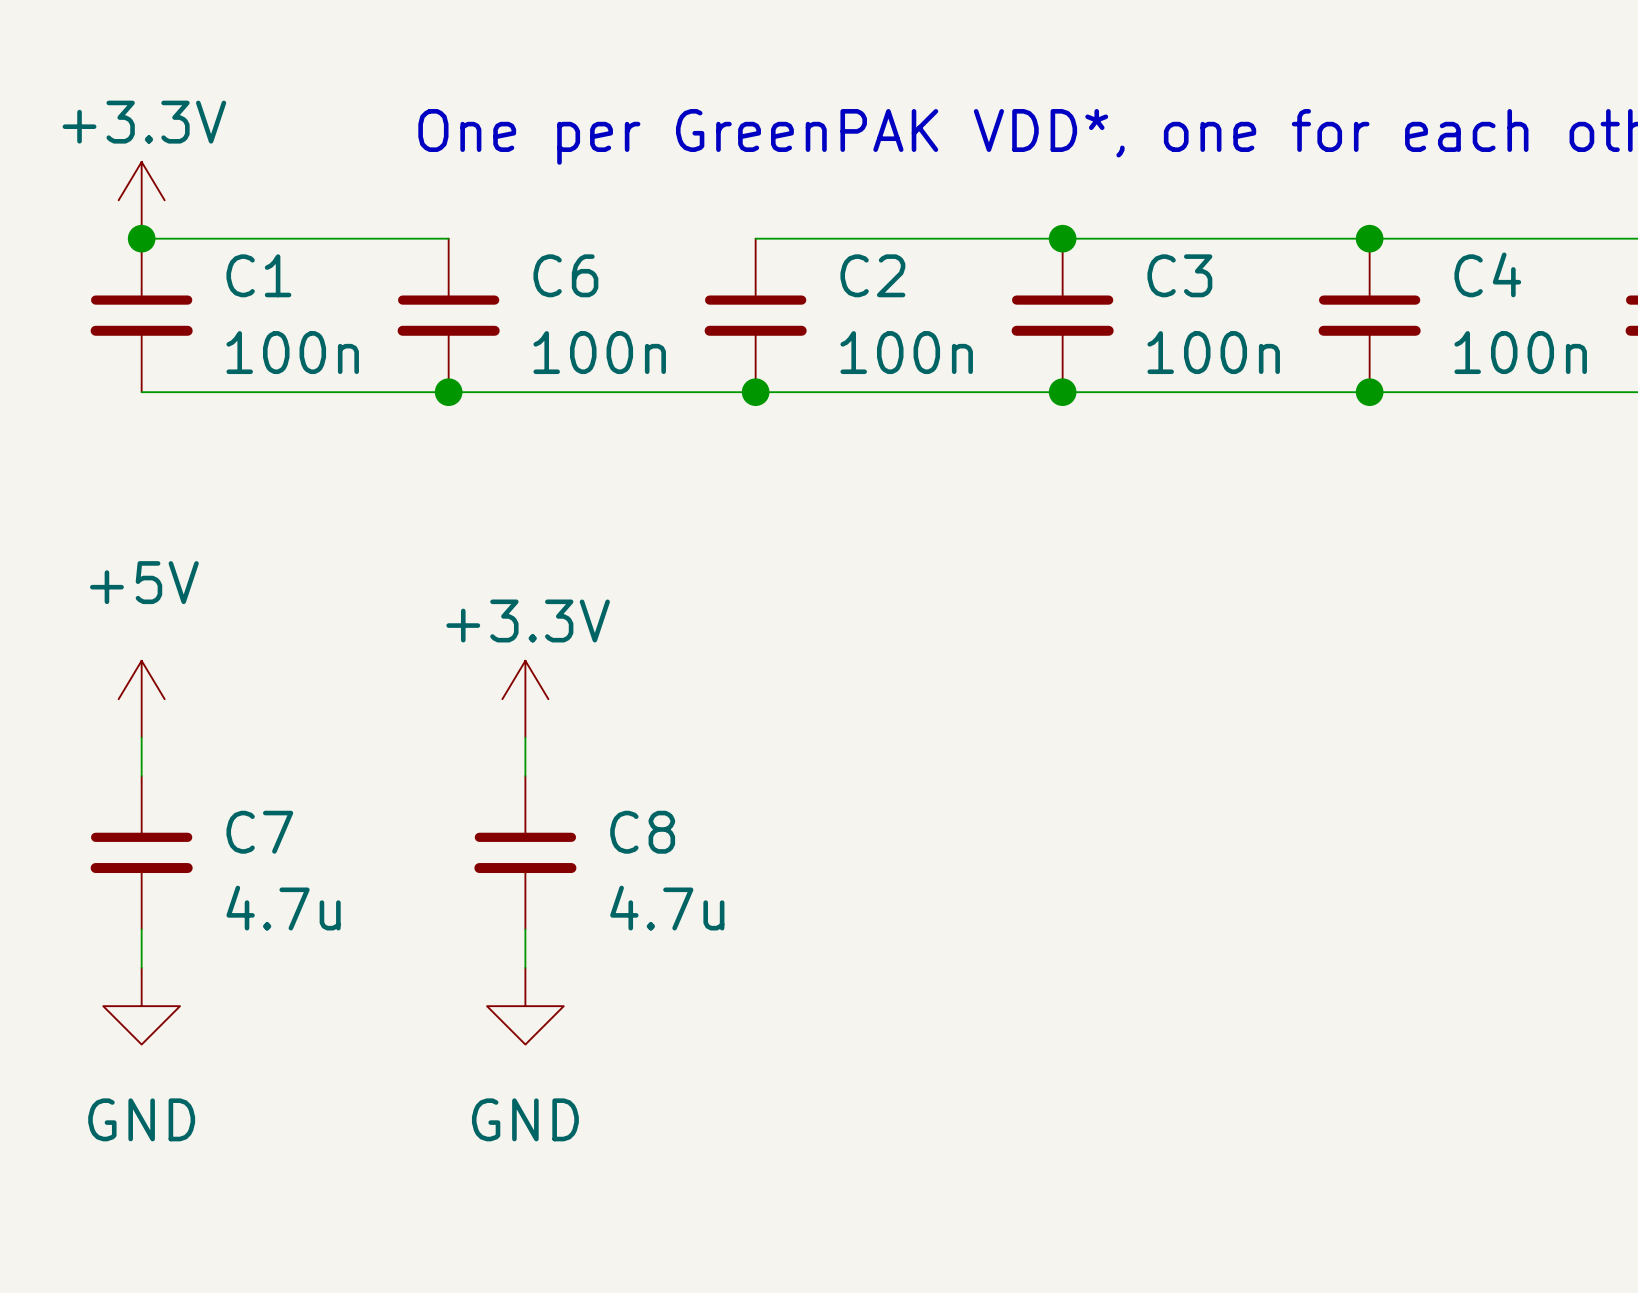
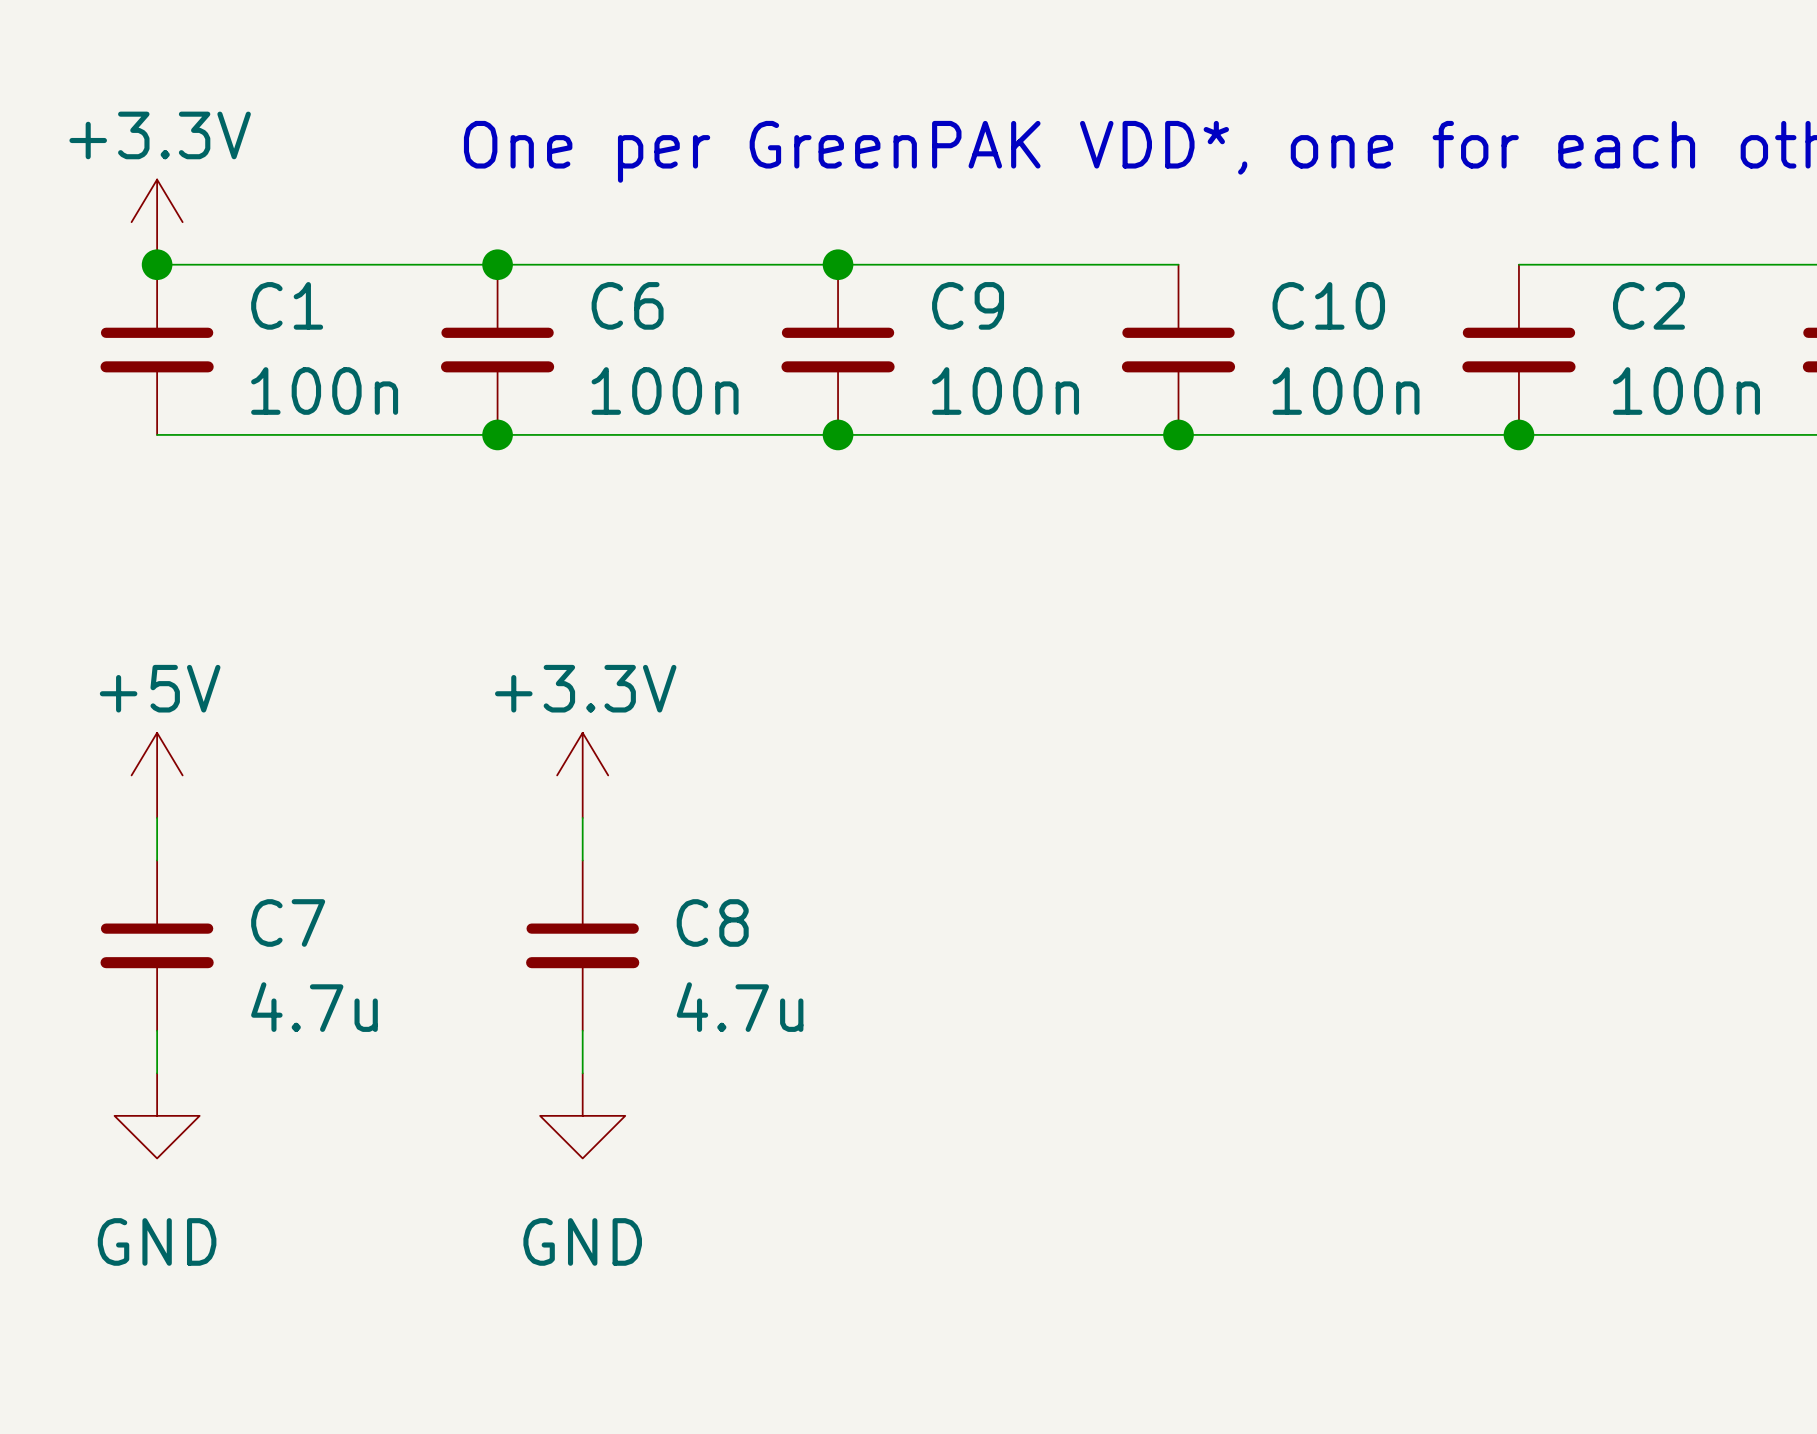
junction: none -> (497, 264)
junction: none -> (838, 264)
wire: (1062, 238) (1369, 238) -> (497, 264) (838, 264)
junction: (1062, 238) -> none
junction: (1369, 238) -> none
C4 name: C4 (1487, 274) -> C2 (1648, 305)
C2 name: C2 (872, 275) -> C9 (968, 305)
C3 name: C3 (1179, 275) -> C10 (1328, 305)
power symbol text position: +5V (144, 582) -> +5V (160, 688)

